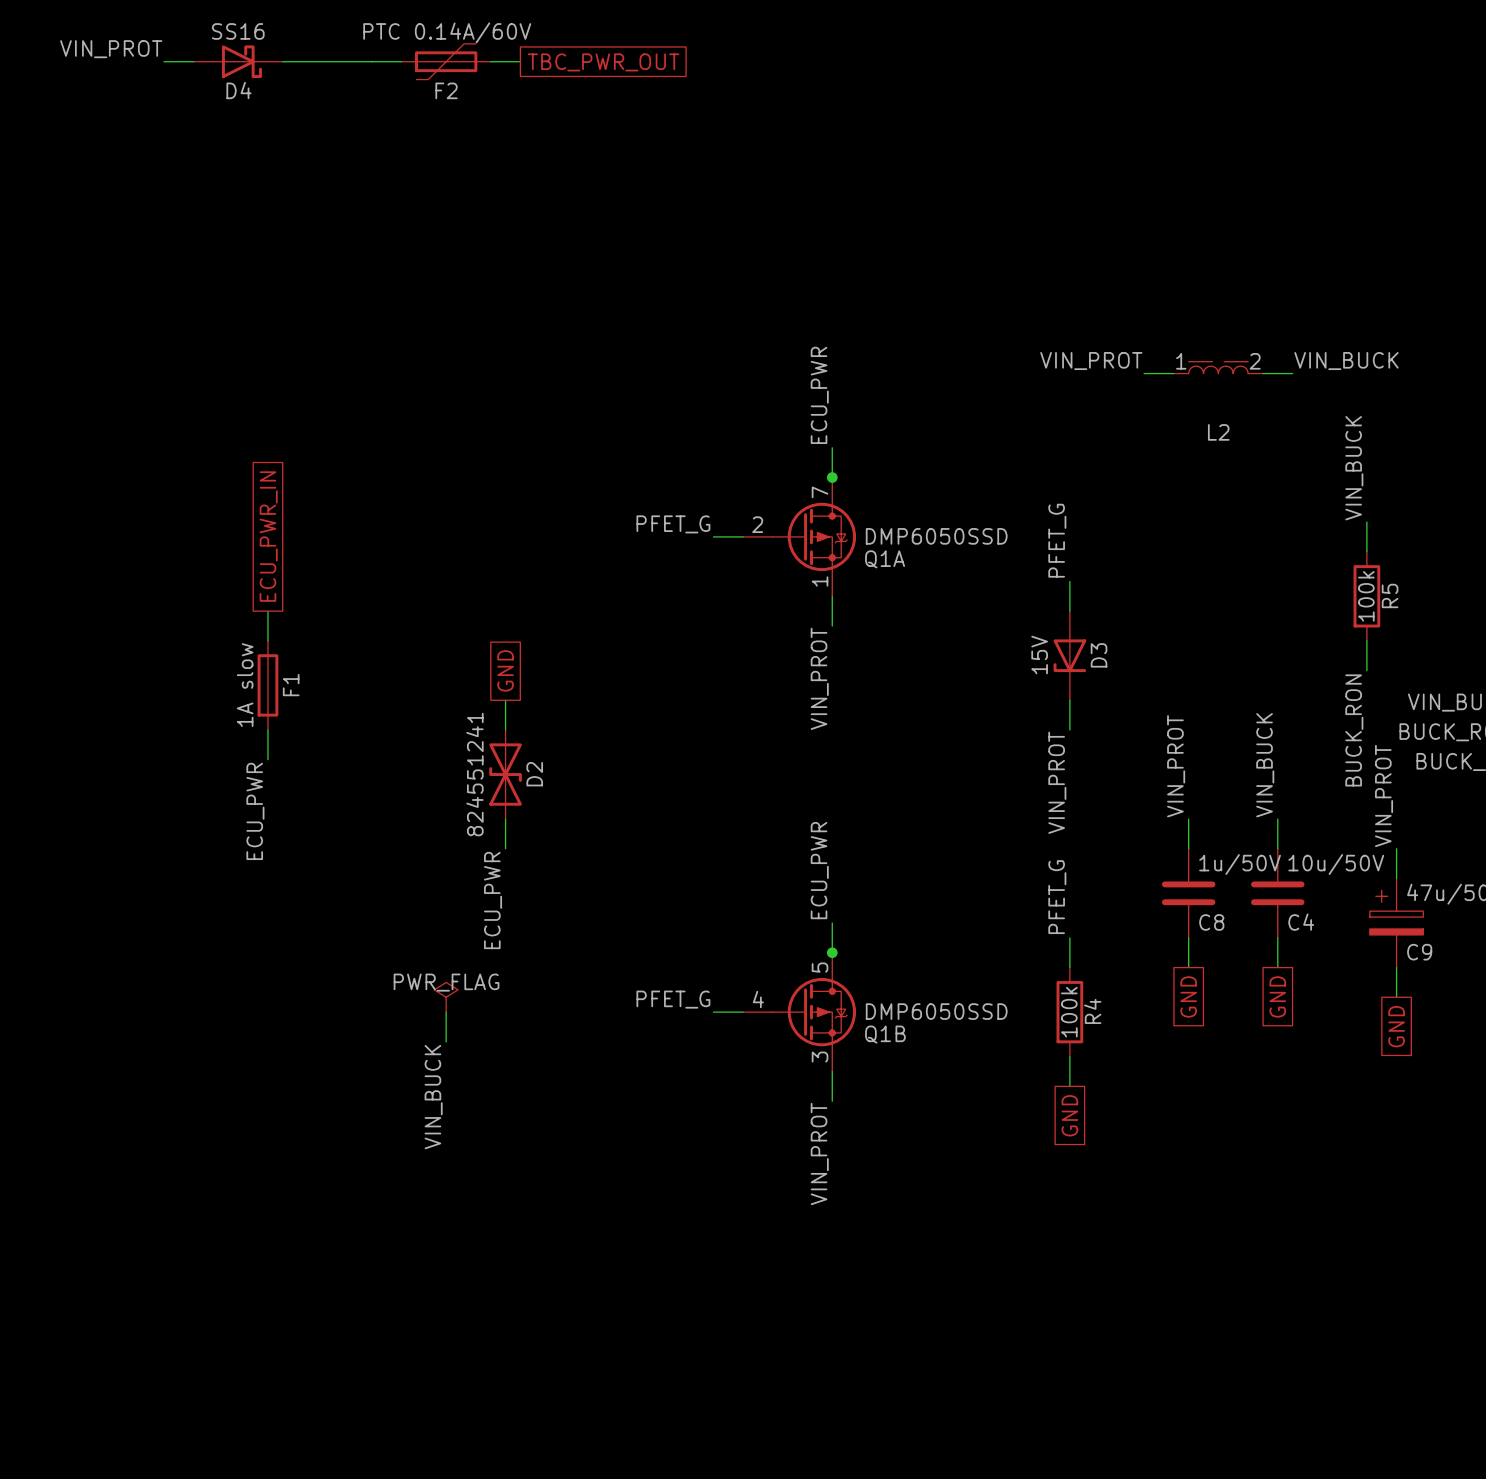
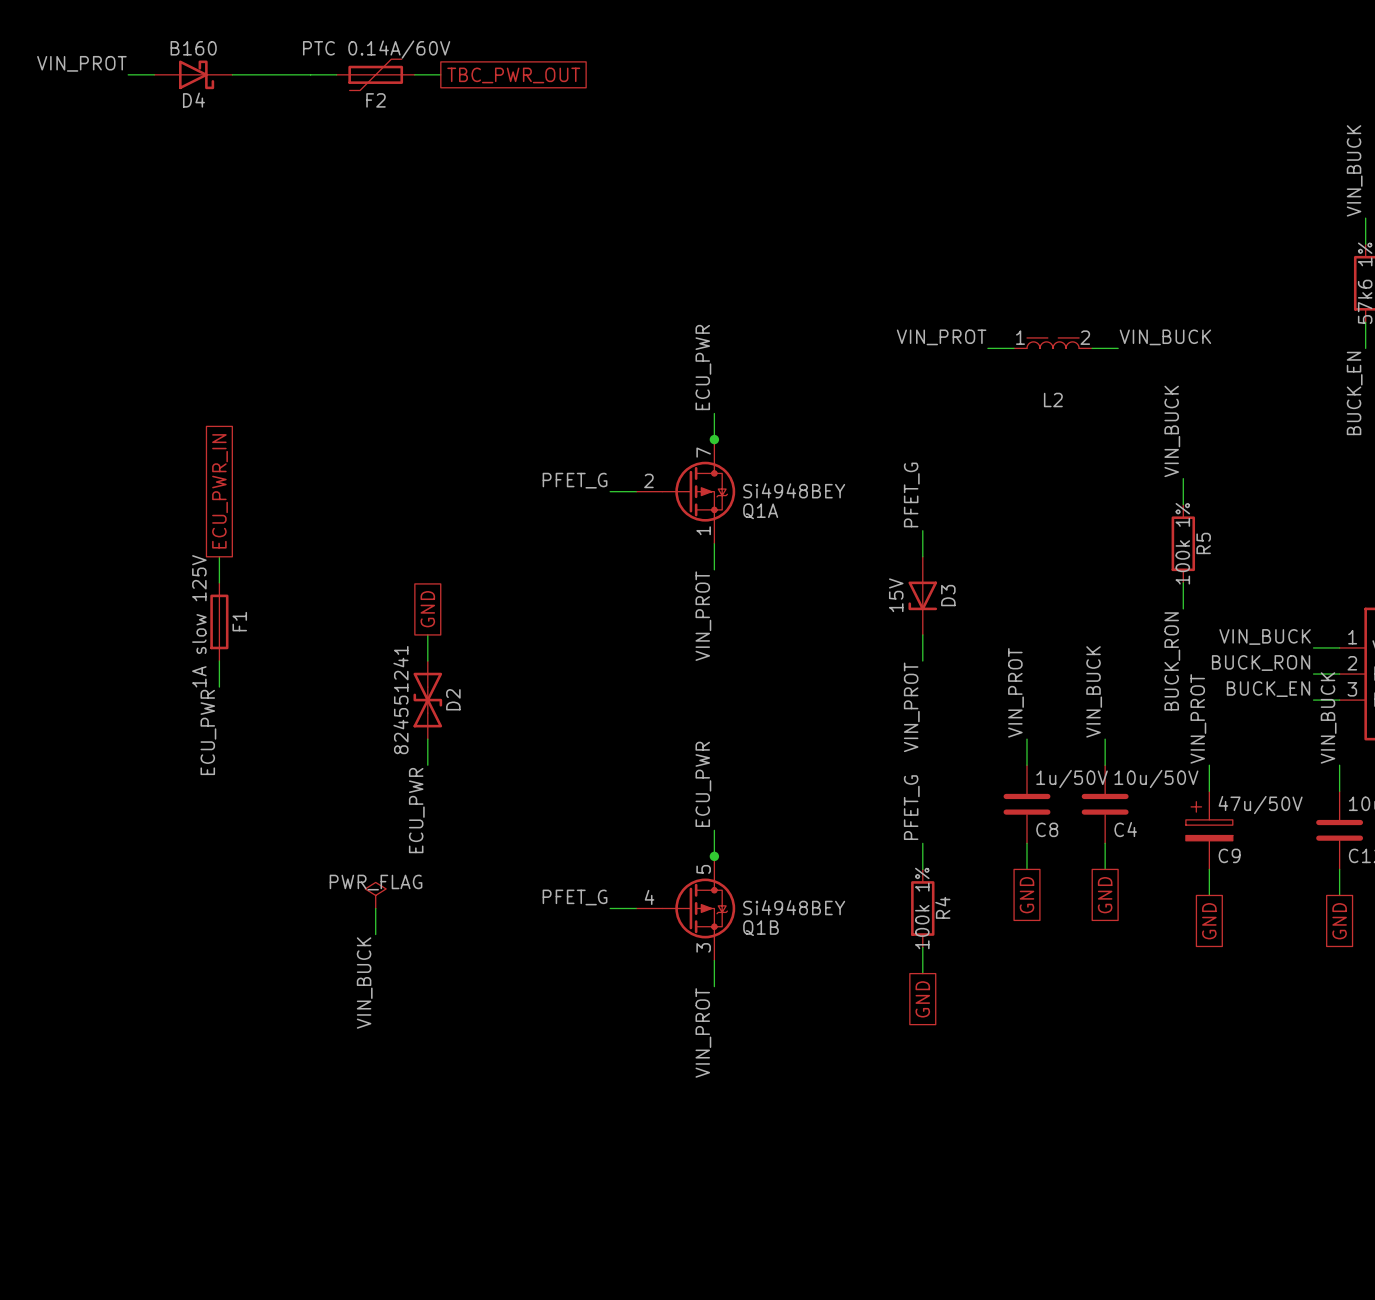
D4 value: SS16 (238, 31) -> B160 (193, 48)
Q1A value: DMP6050SSD (936, 536) -> Si4948BEY (794, 490)
R5 value: 100k (1366, 596) -> 100k 1% (1182, 543)
F1 value: 1A slow (245, 685) -> 1A slow 125V (199, 621)
Q1B value: DMP6050SSD (936, 1011) -> Si4948BEY (794, 907)
R4 value: 100k (1069, 1012) -> 100k 1% (922, 908)

